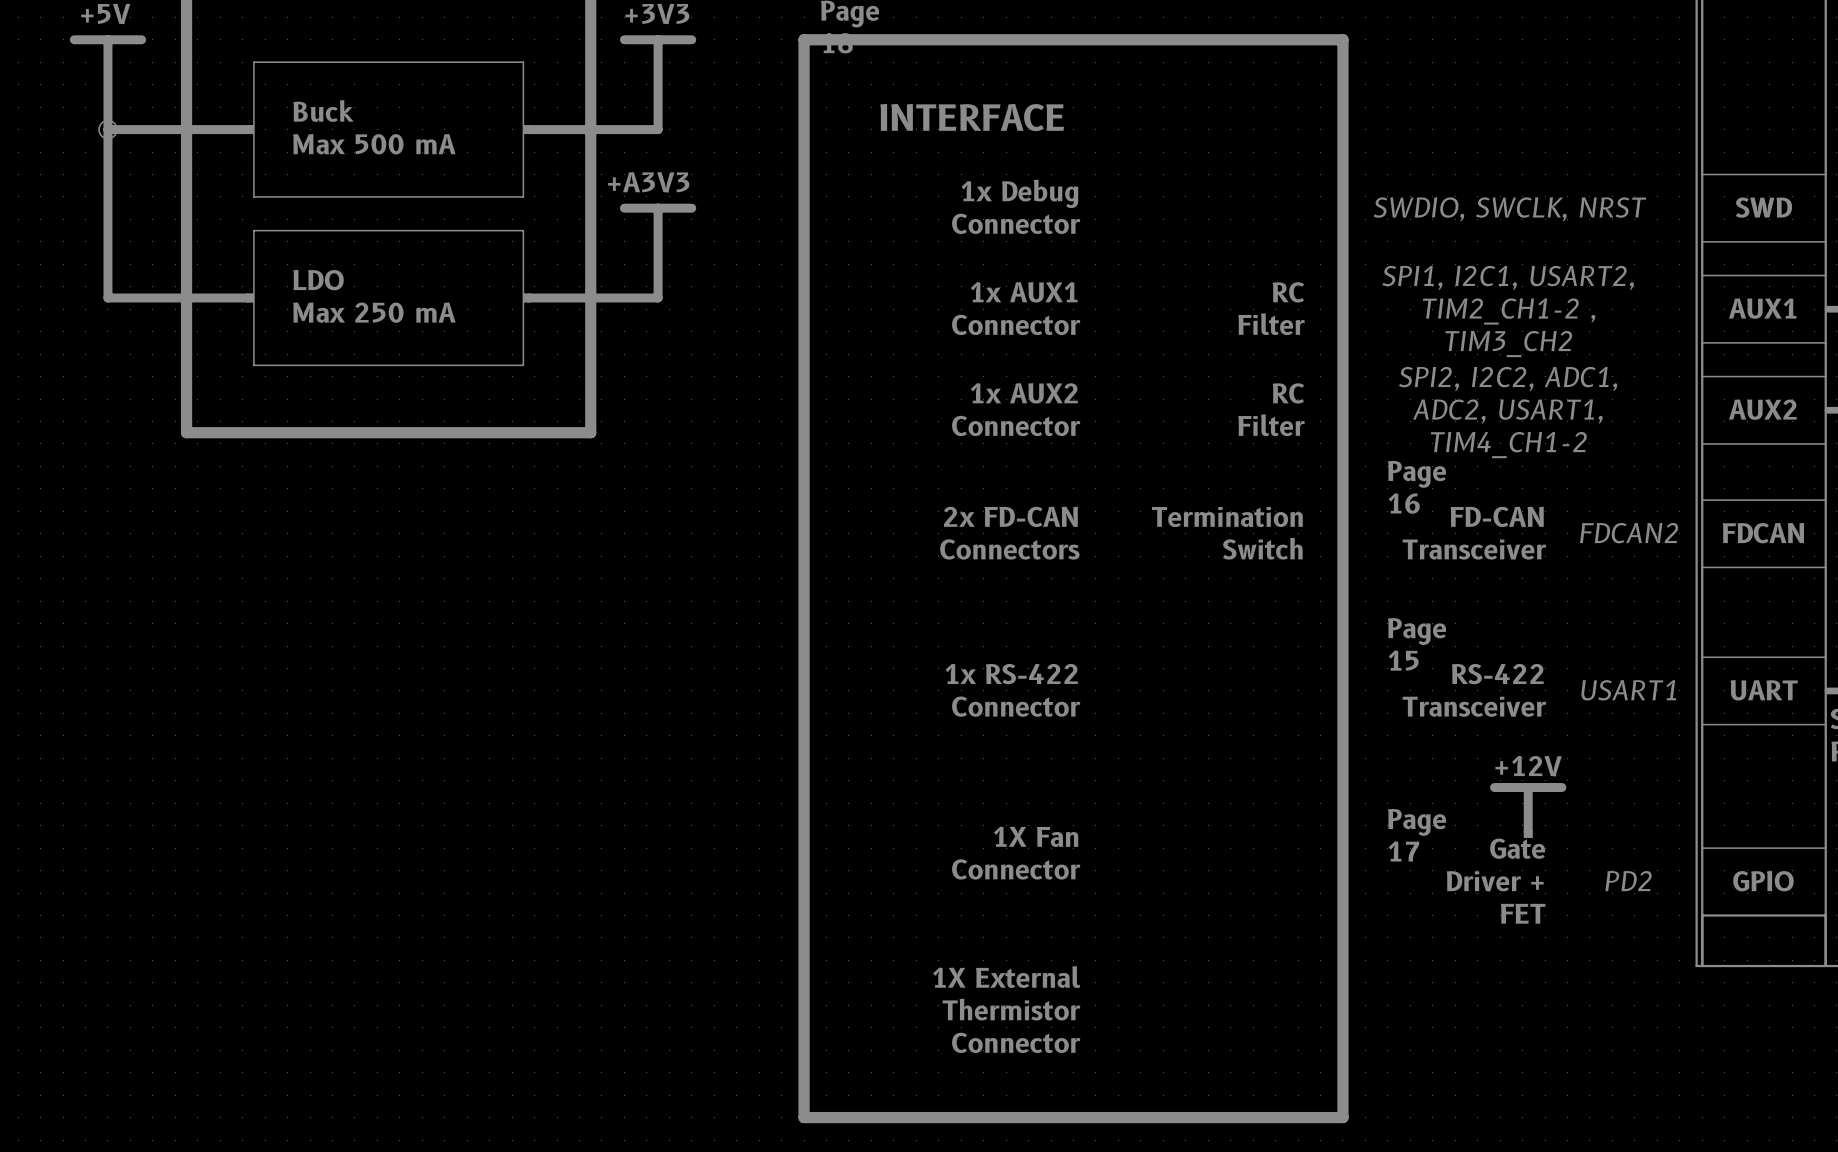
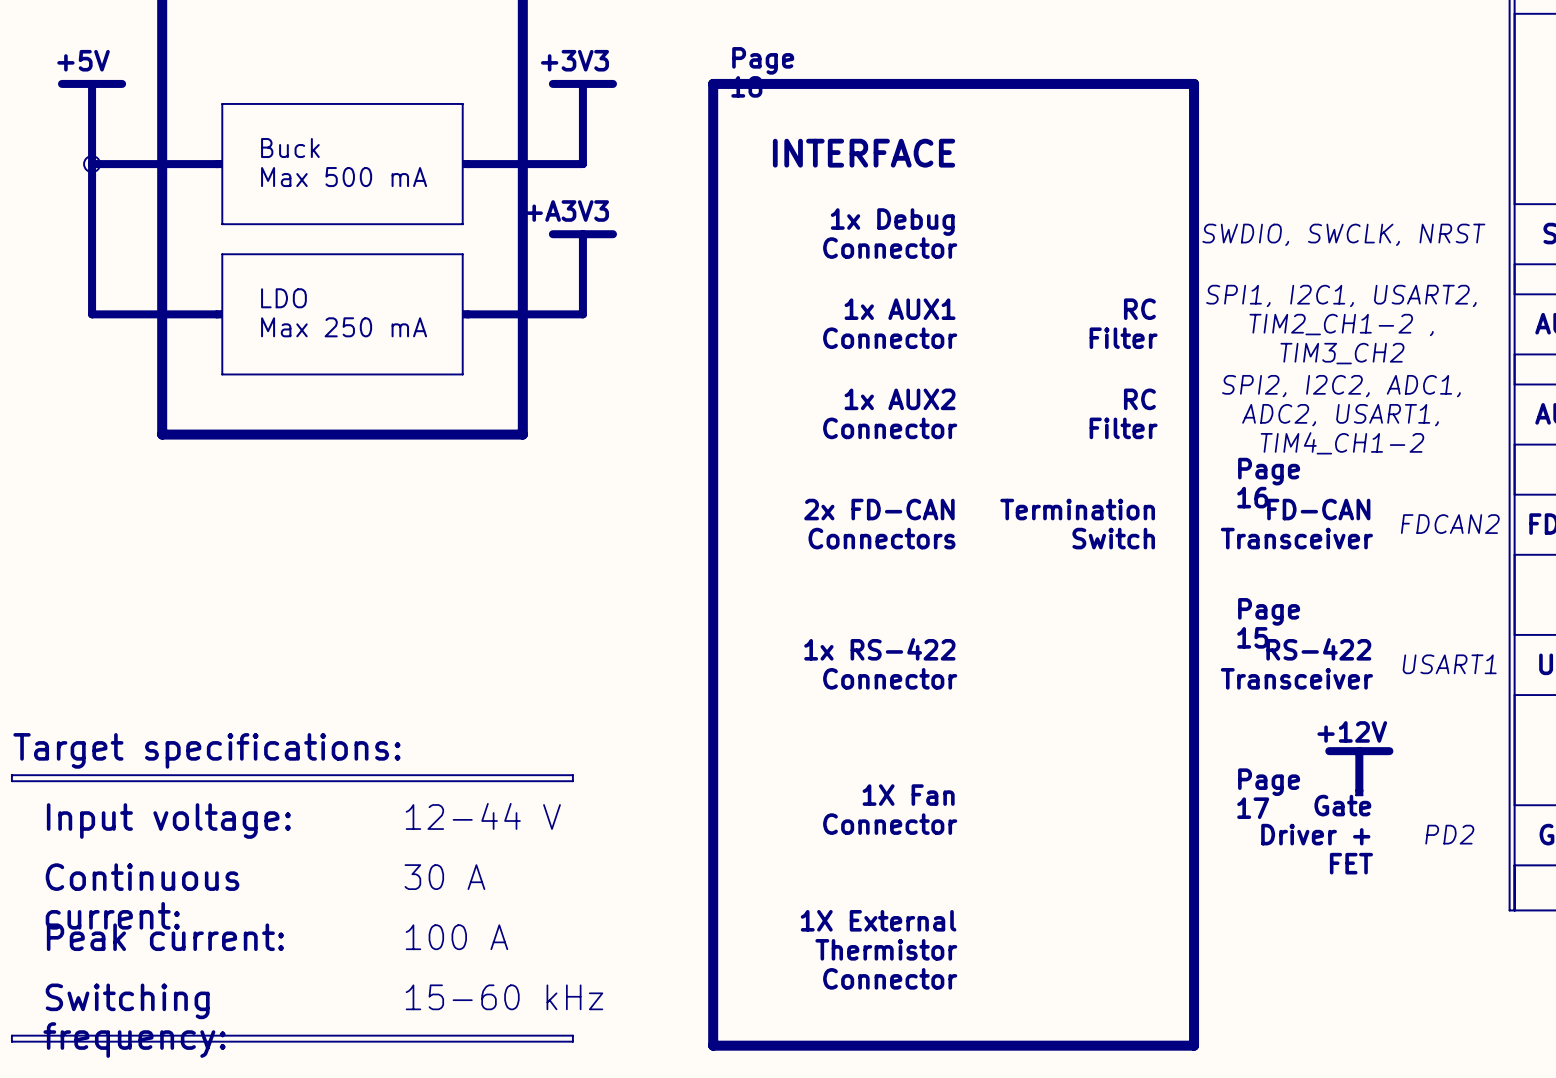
text: none -> Target specifications: (206, 750)
line: none -> (11, 775) (11, 781) (572, 781) (572, 775) (11, 775)
text: none -> 12-44 V (483, 816)
text: none -> Input voltage: (168, 821)
text: none -> Continuous (142, 877)
text: none -> 30 A (444, 877)
text: none -> current: (112, 915)
text: none -> Peak current: (165, 937)
text: none -> 100 A (456, 937)
text: none -> 15-60 kHz (504, 997)
text: none -> Switching (127, 1001)
line: none -> (11, 1035) (572, 1035) (572, 1041) (11, 1041) (11, 1035)
text: none -> frequency: (134, 1040)

